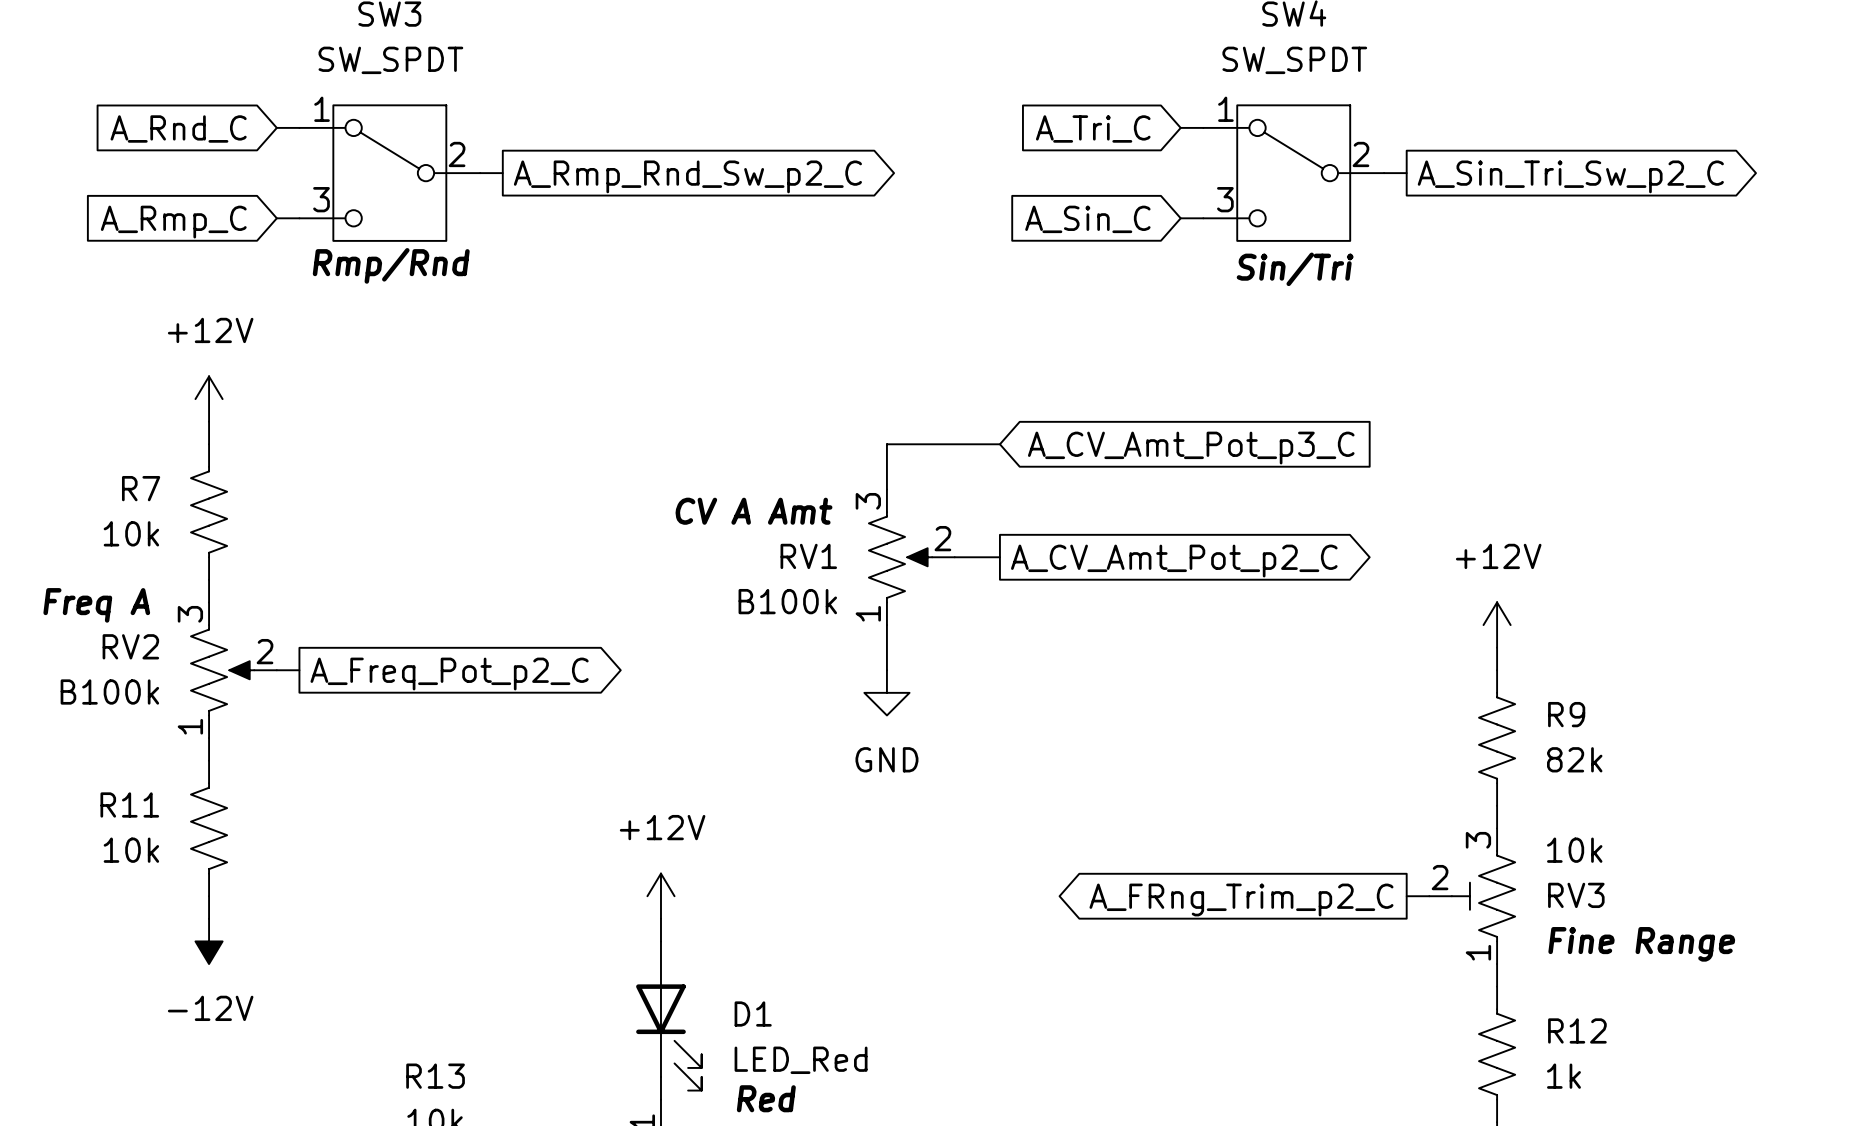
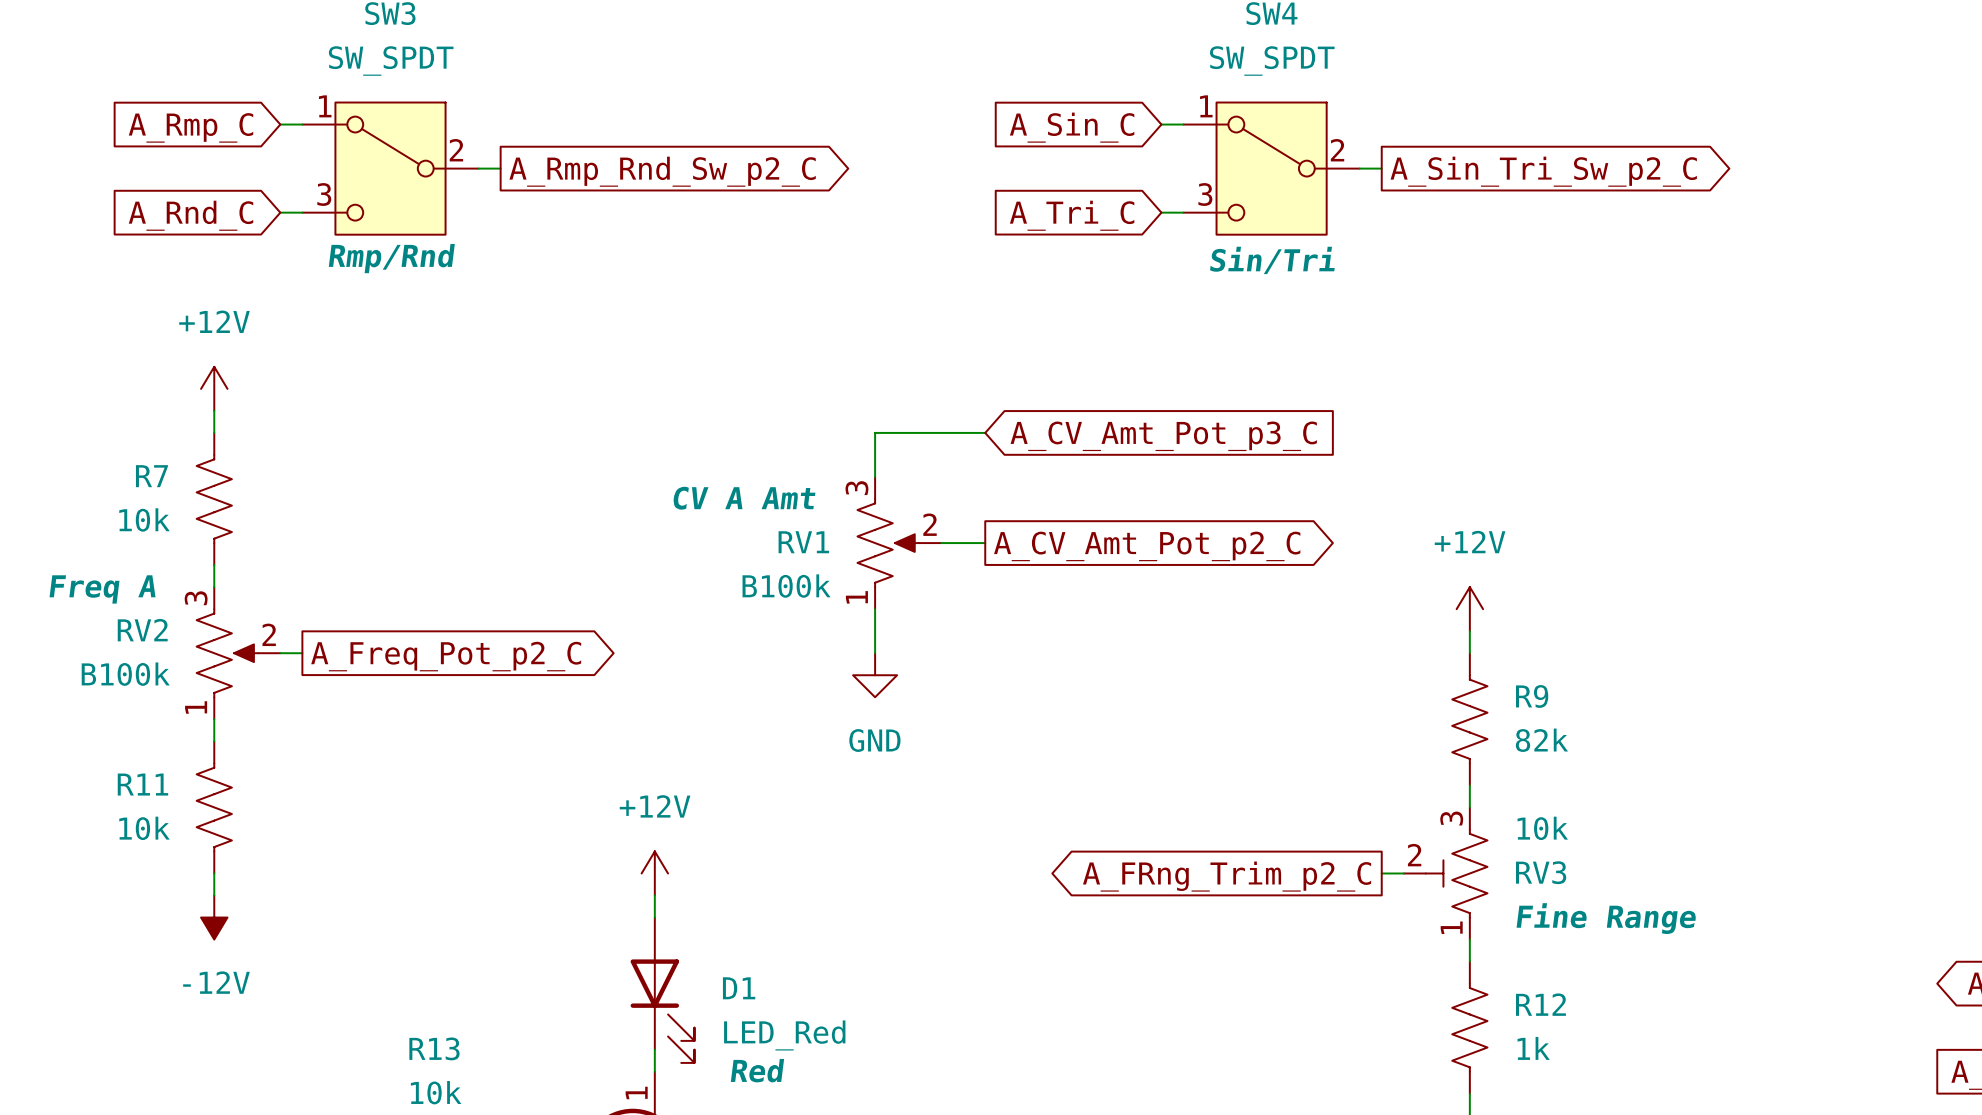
global label: A_Rnd_C (178, 129) -> A_Rmp_C (191, 127)
global label: A_Tri_C (1093, 129) -> A_Sin_C (1072, 127)
global label: A_Sin_C (1087, 219) -> A_Tri_C (1072, 215)
global label: A_Rmp_C (173, 222) -> A_Rnd_C (191, 215)

